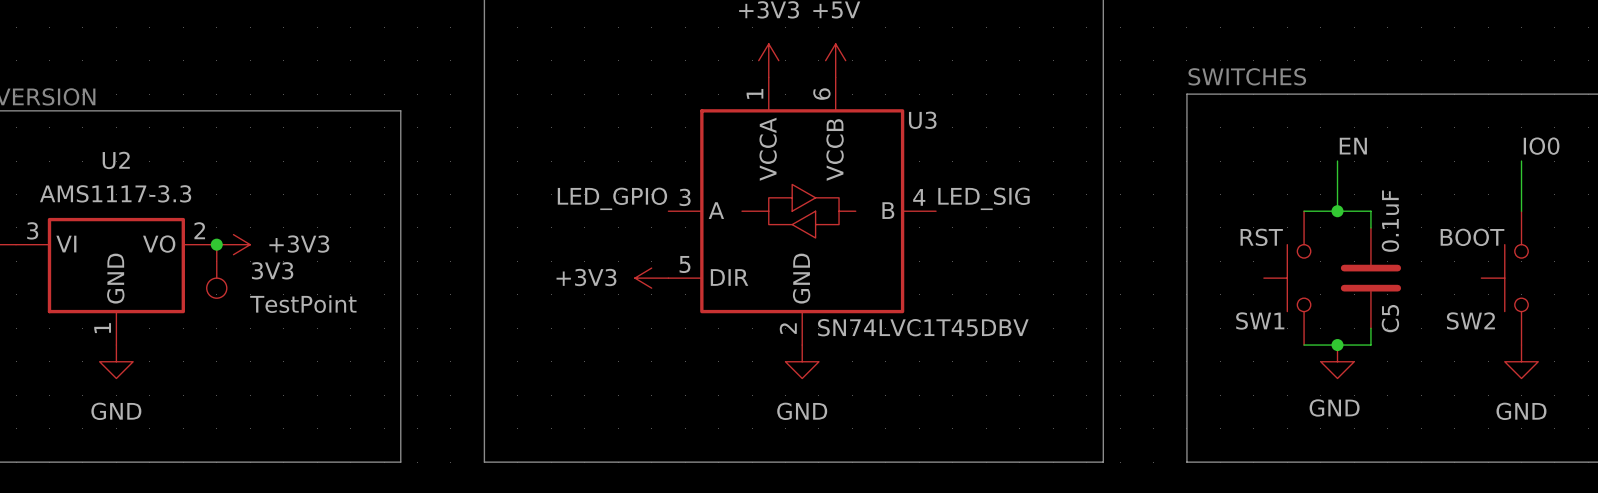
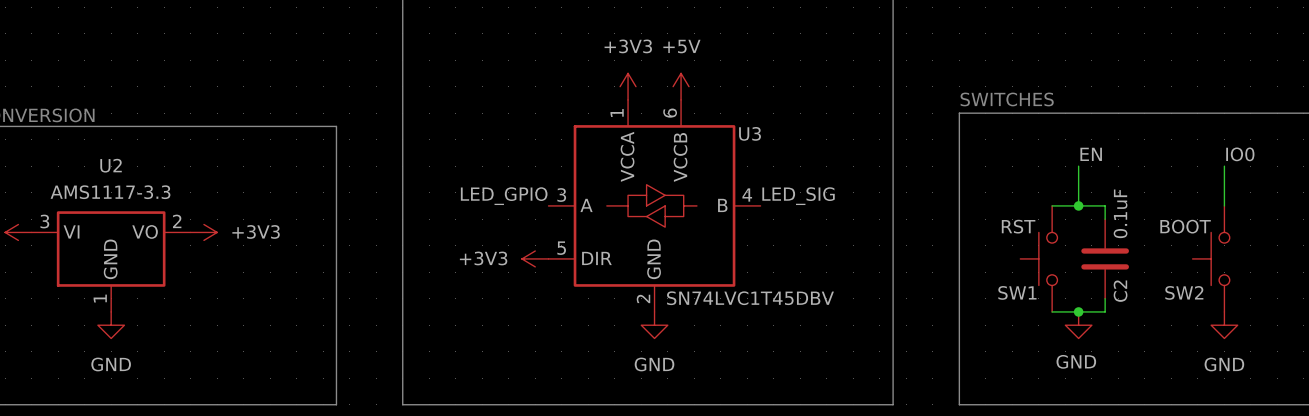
junction: (216, 244) -> none
3V3: TestPoint (216, 271) -> none
C5 name: C5 (1390, 318) -> C2 (1120, 291)

